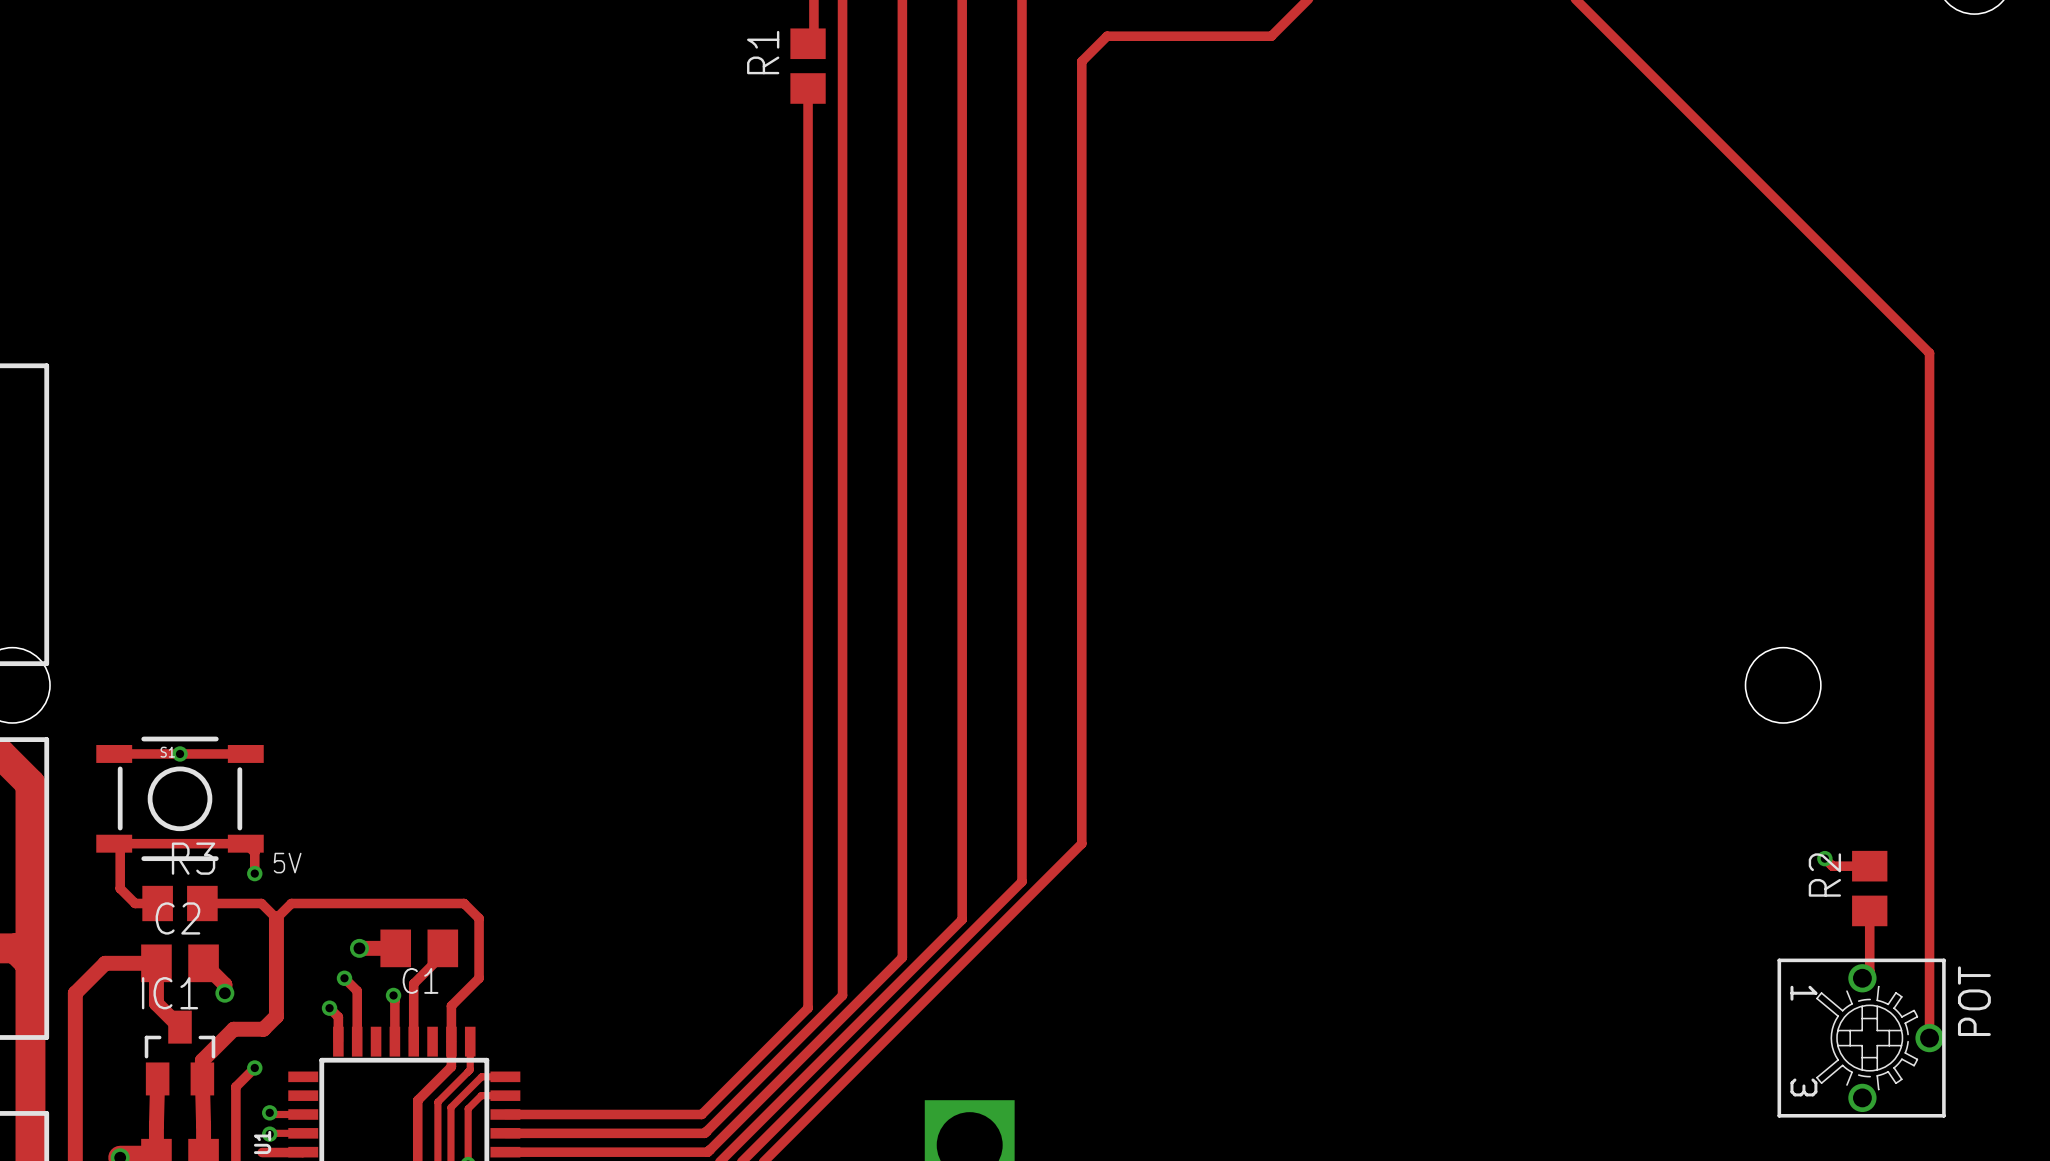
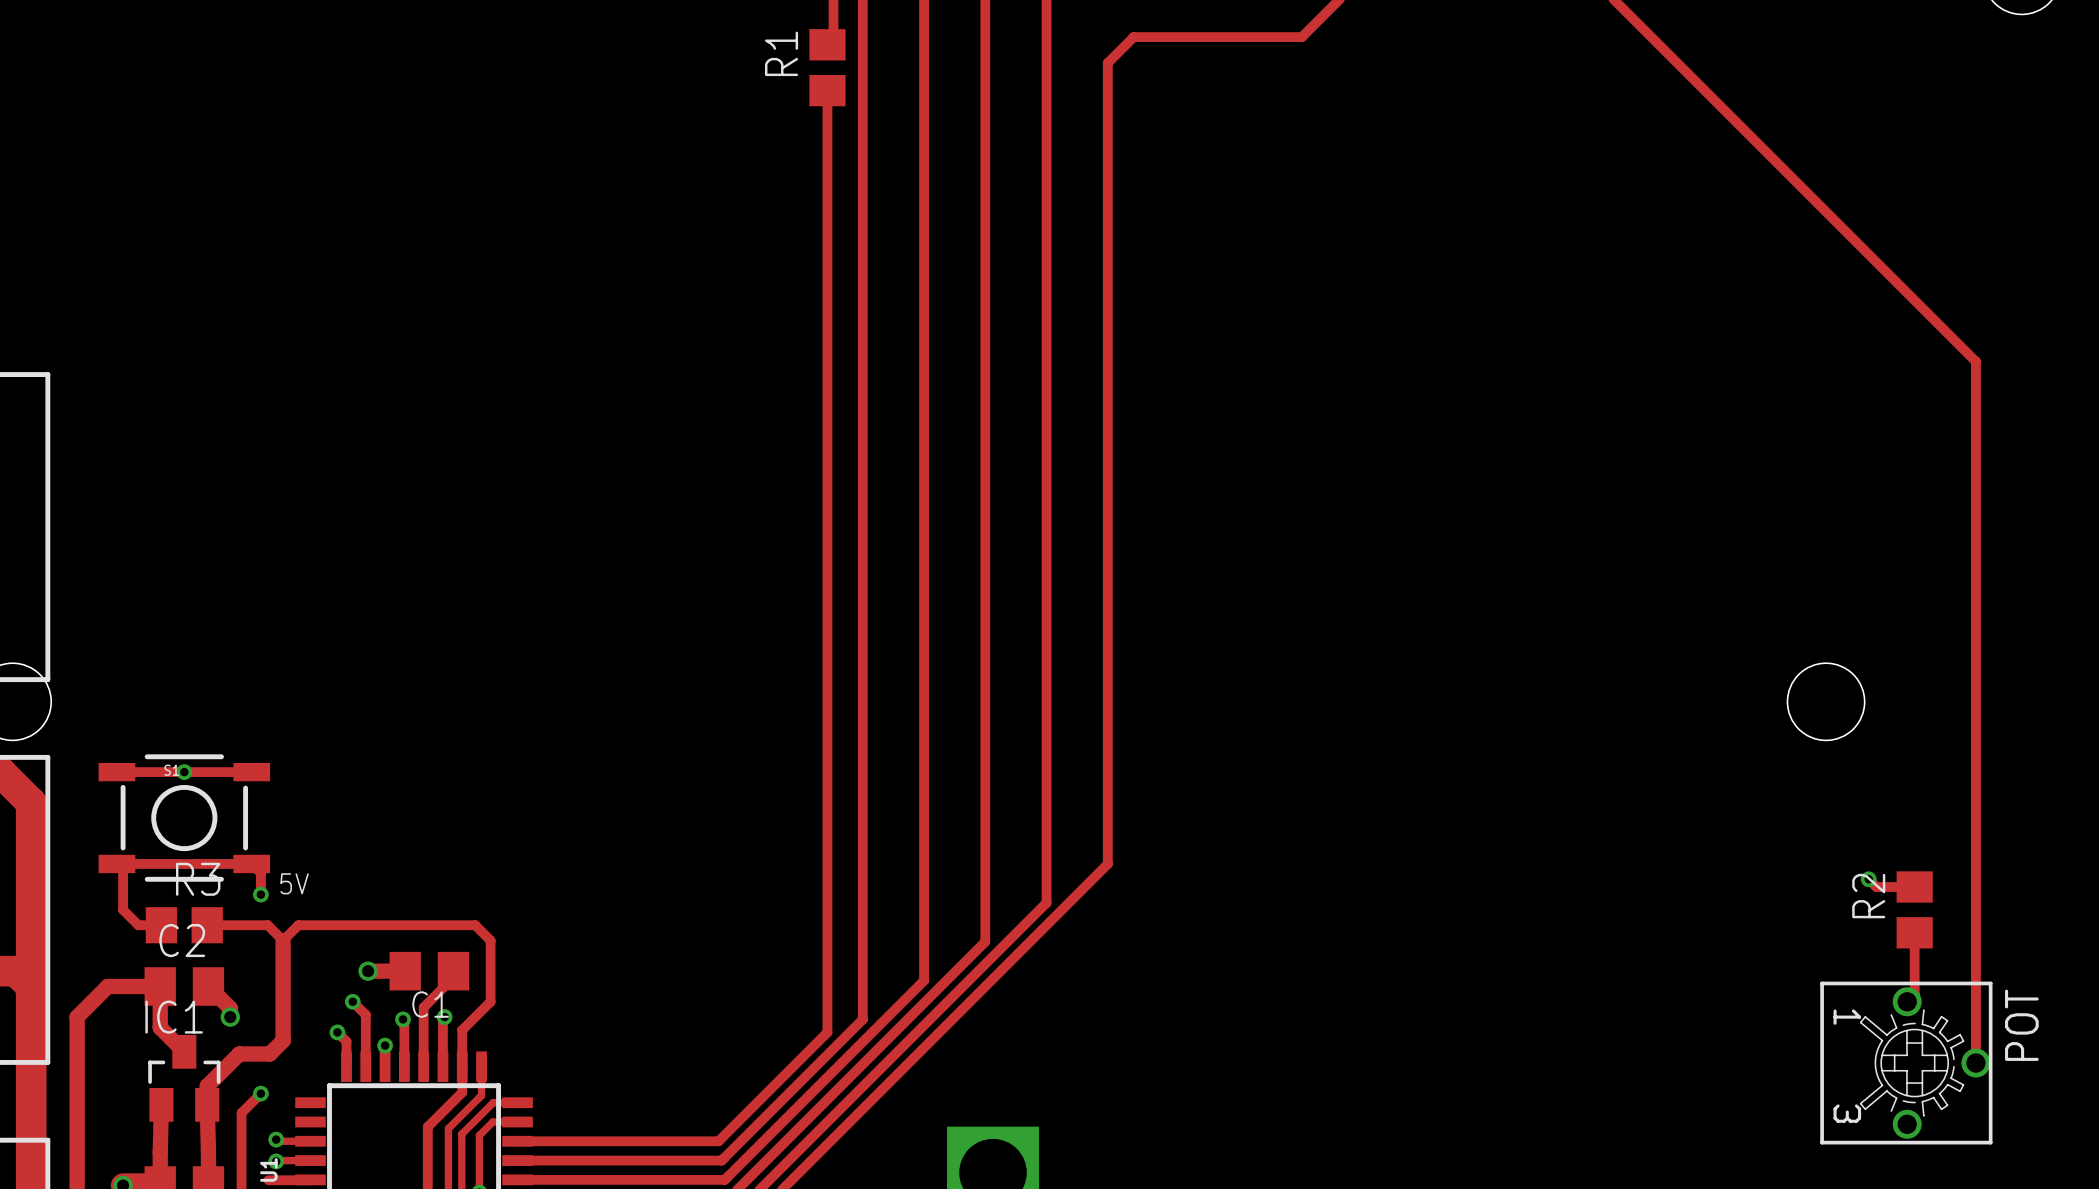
track: none -> (444, 1017) (442, 1018) (442, 1066)
via: none -> (444, 1017)
via: none -> (385, 1045)

